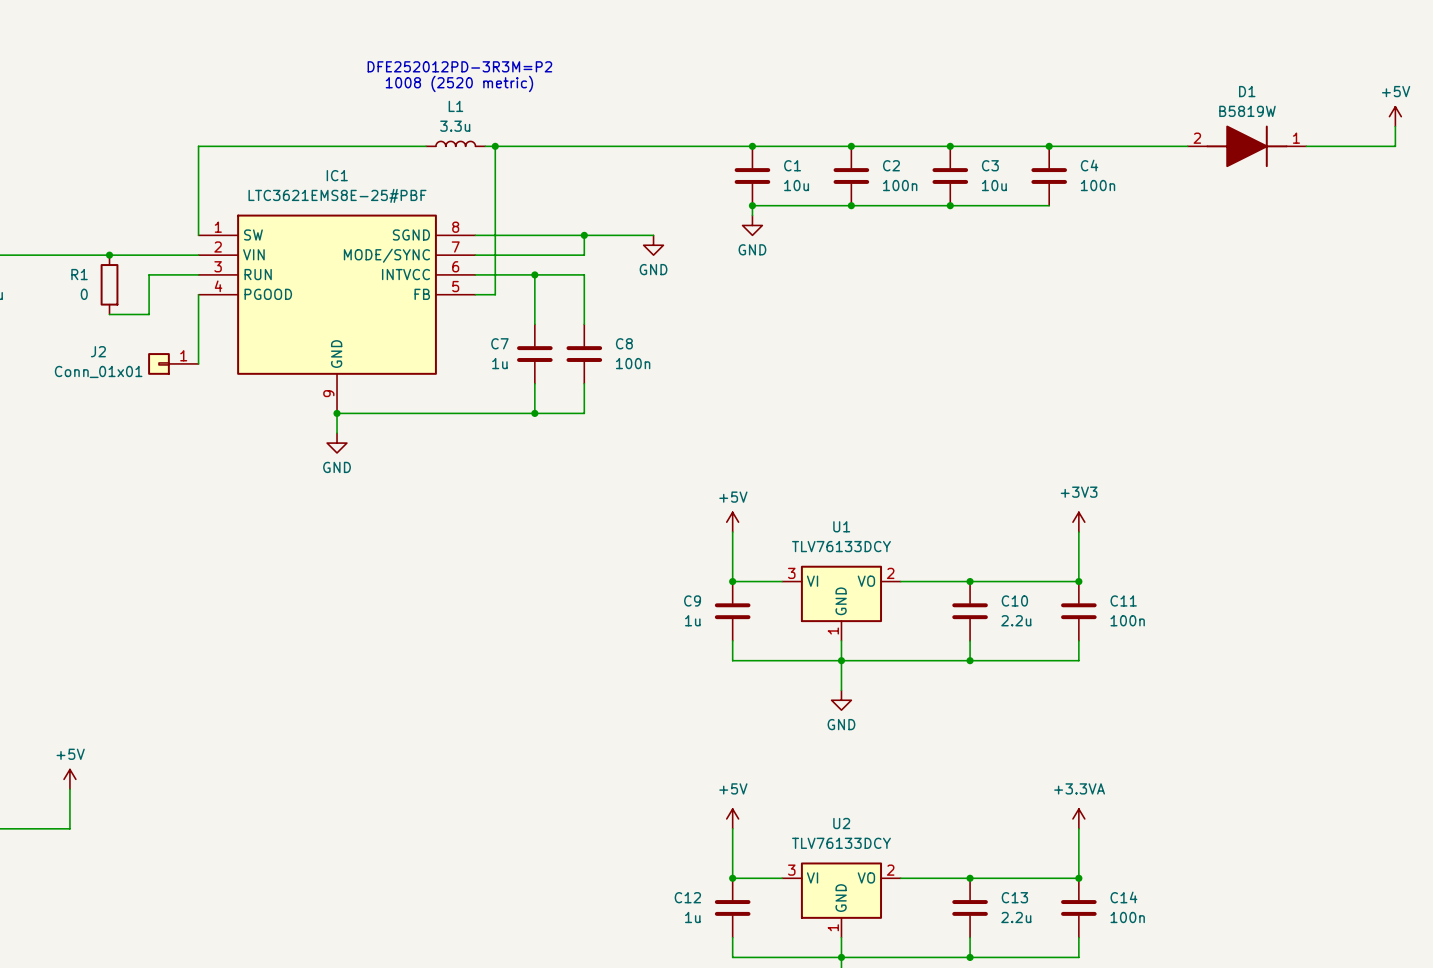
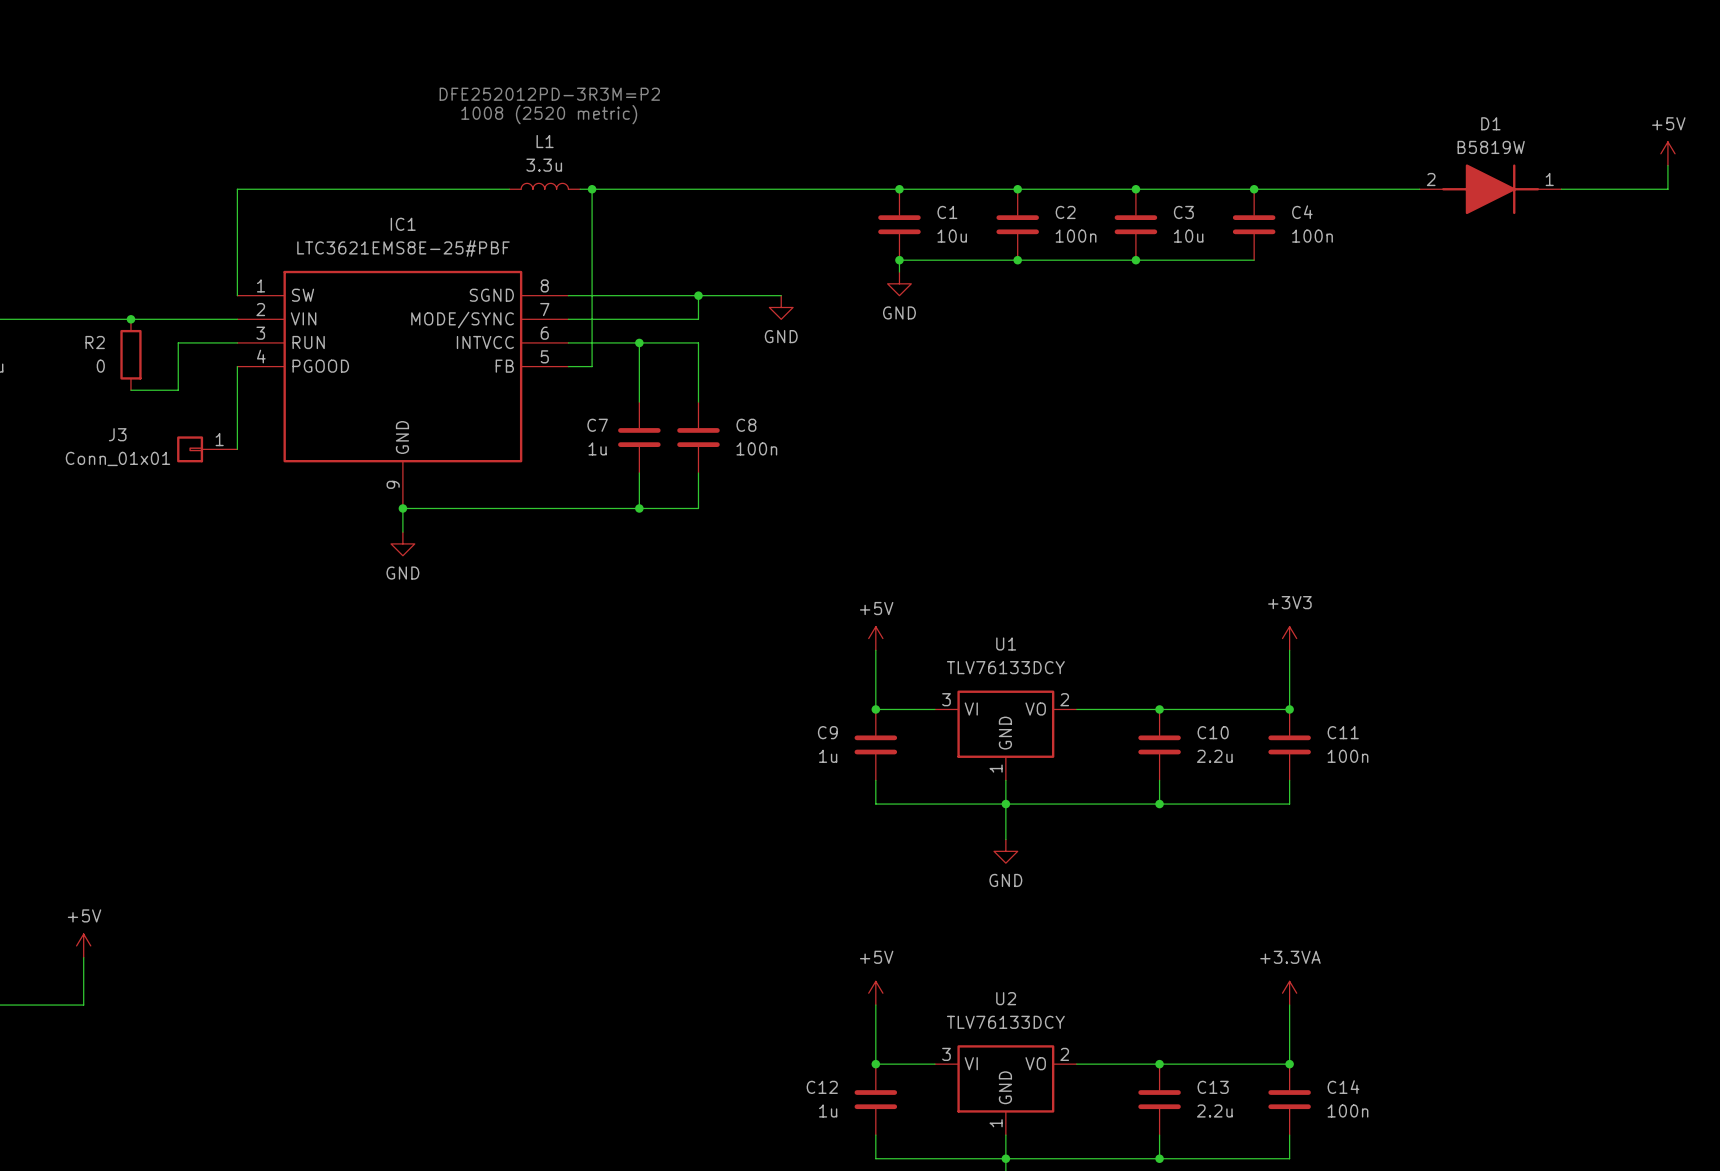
R1 name: R1 (79, 274) -> R2 (95, 342)
J2 name: J2 (98, 351) -> J3 (117, 434)

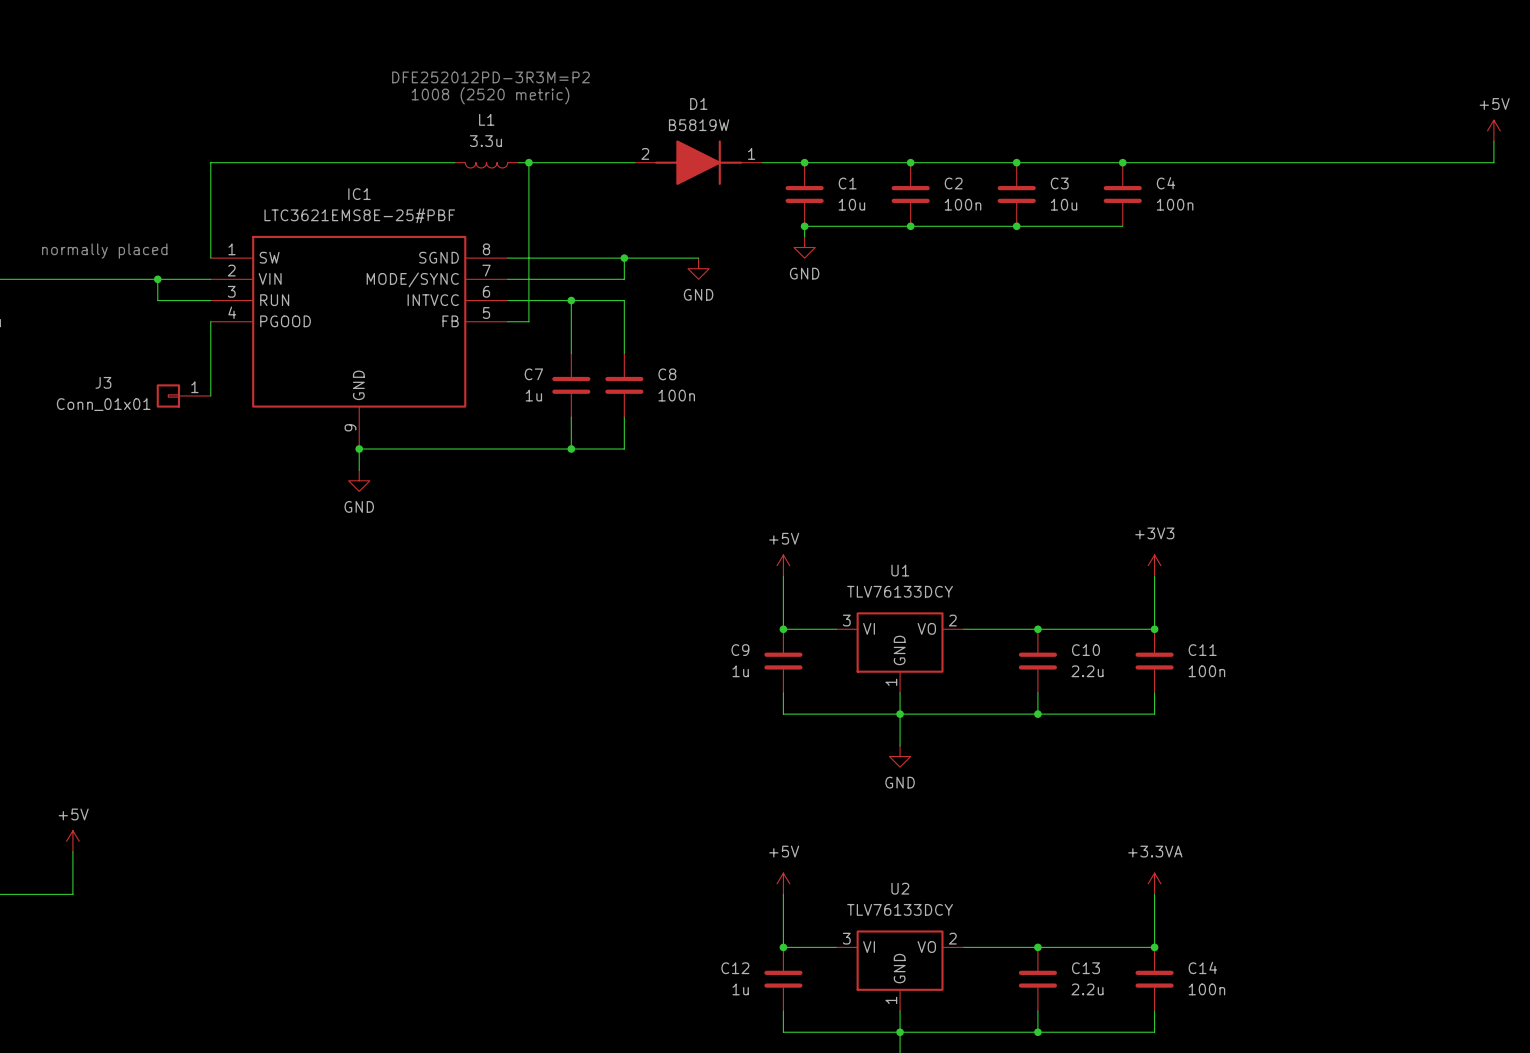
L1 rotation: 0° (544, 186) -> 180° (486, 165)
D1 position: (1490, 189) -> (698, 162)
text: none -> normally placed (104, 251)
junction position: (130, 319) -> (157, 279)
wire: (178, 342) (178, 390) (130, 390) -> (157, 300) (157, 279)
R2: 0 (130, 354) -> none

